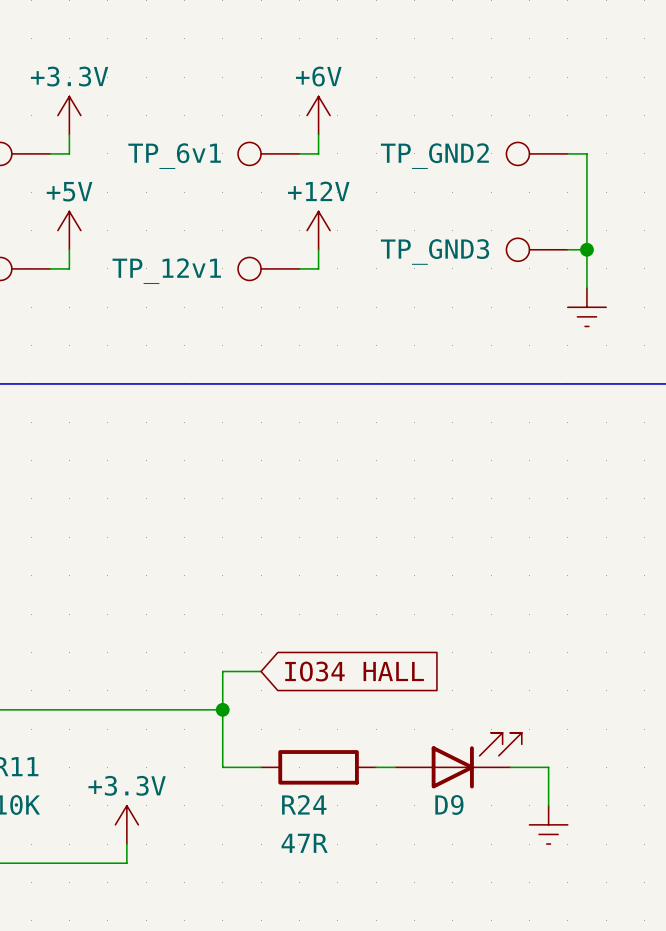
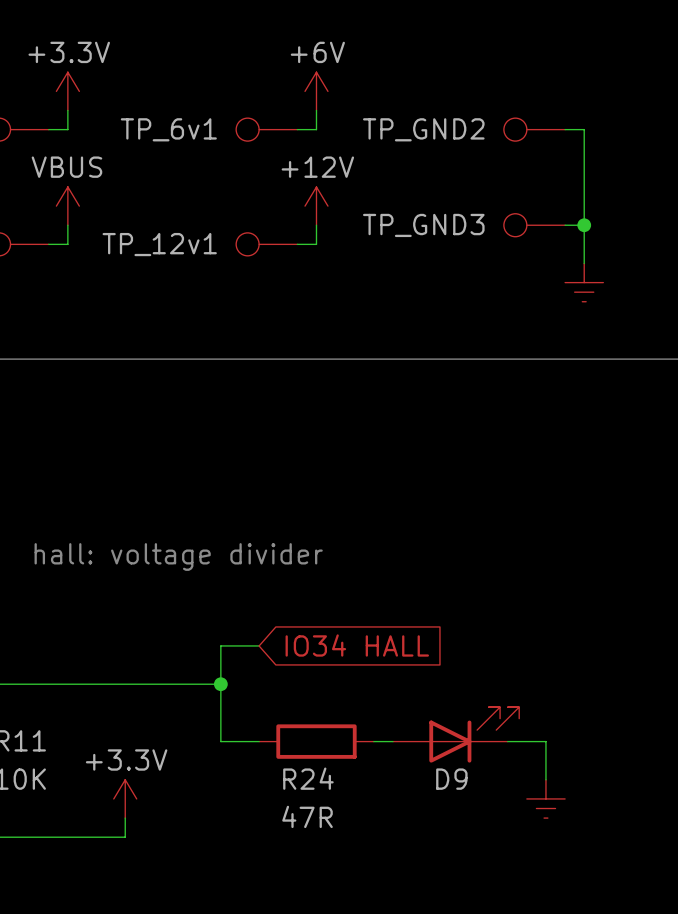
power symbol: +5V (69, 230) -> VBUS (67, 206)
text: none -> hall: voltage divider (178, 556)

